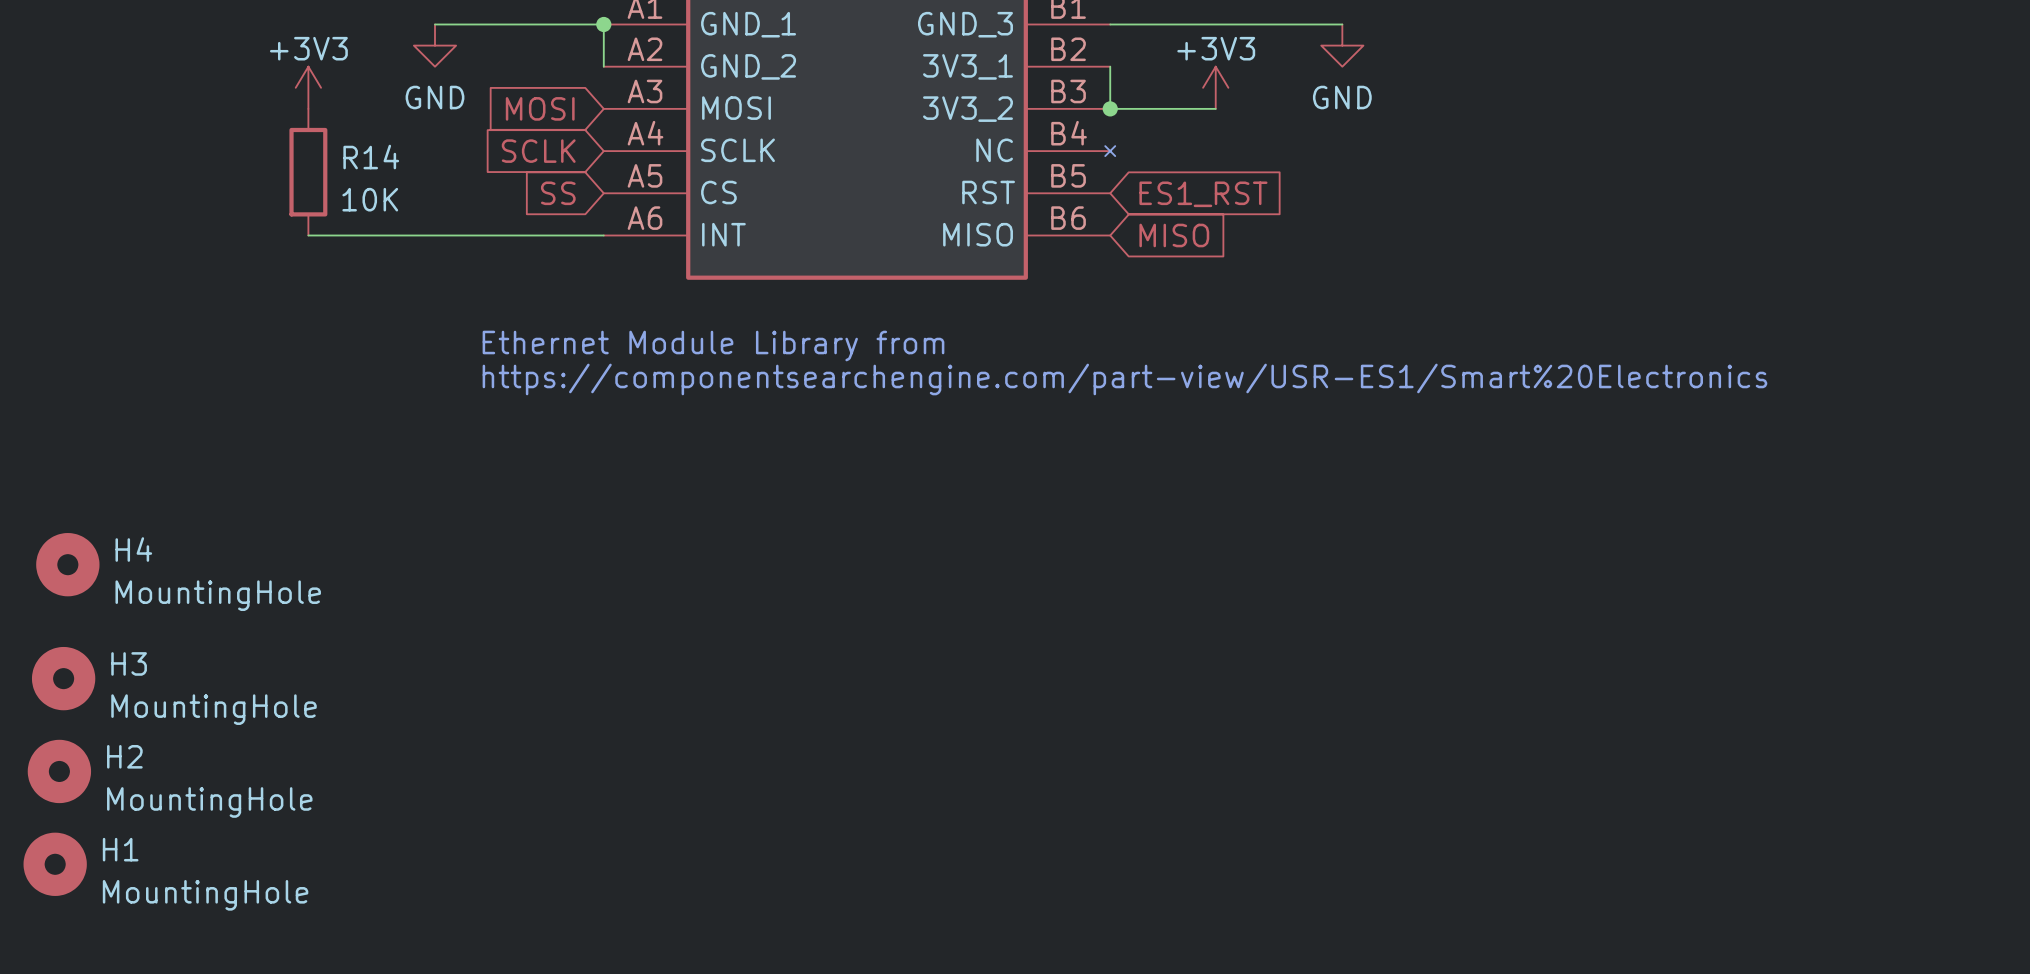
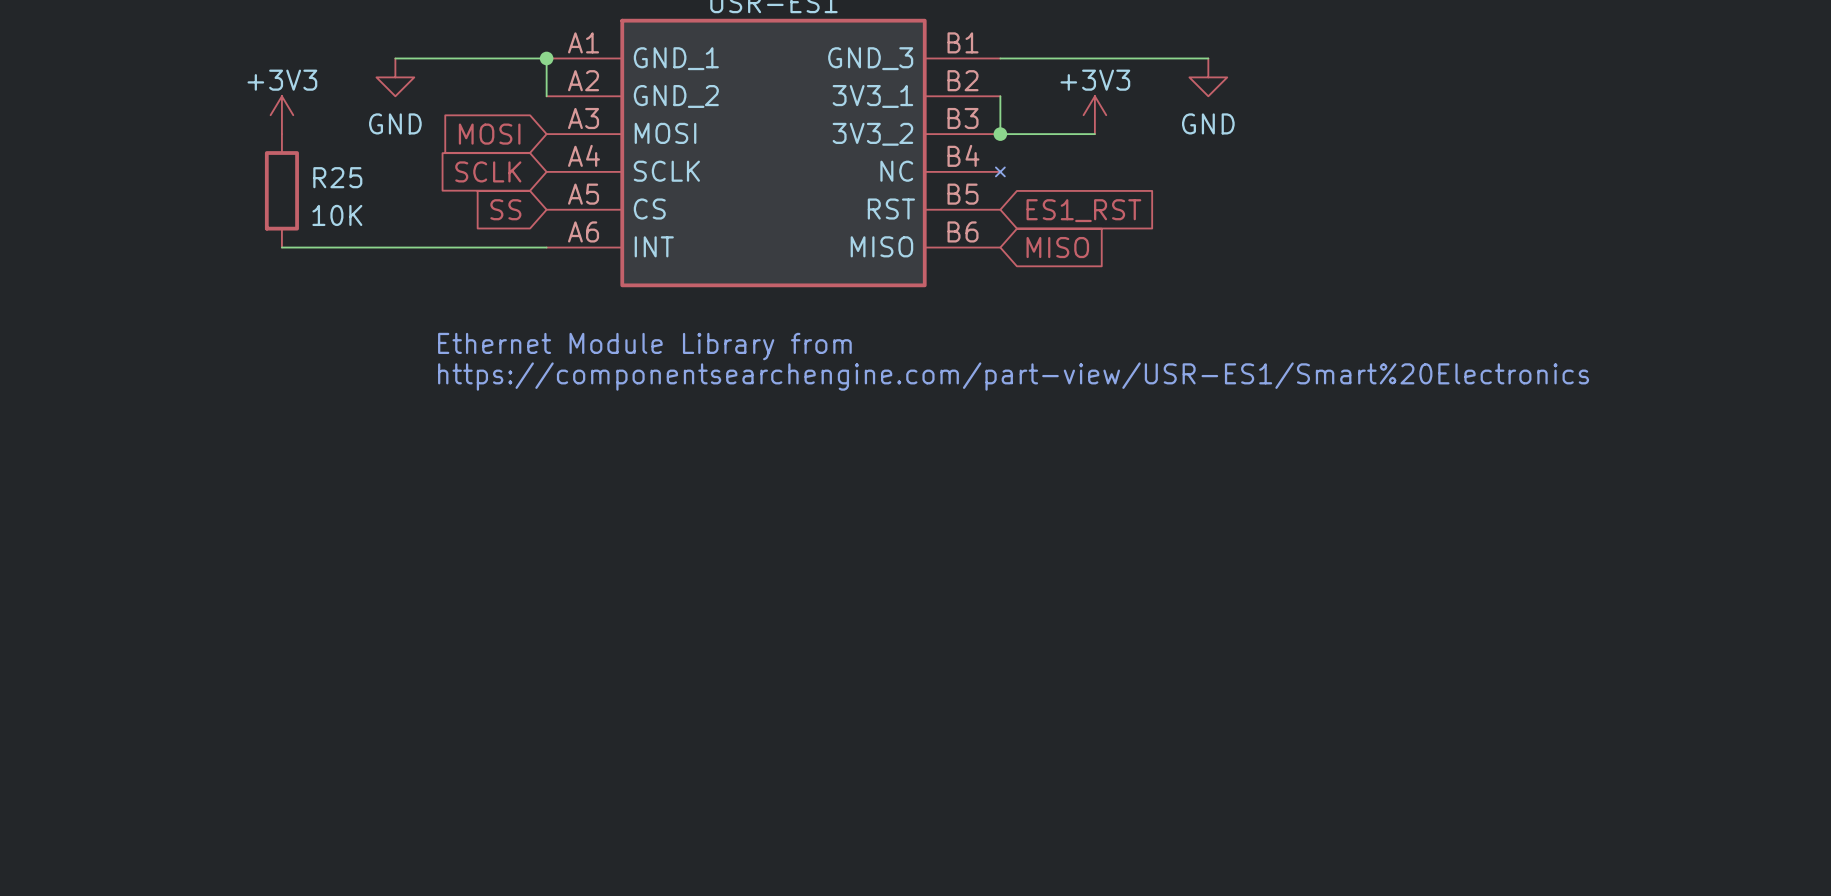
R14 name: R14 (371, 157) -> R25 (337, 177)
H4: MountingHole (67, 564) -> none
H3: MountingHole (63, 678) -> none
H2: MountingHole (59, 771) -> none
H1: MountingHole (55, 864) -> none

